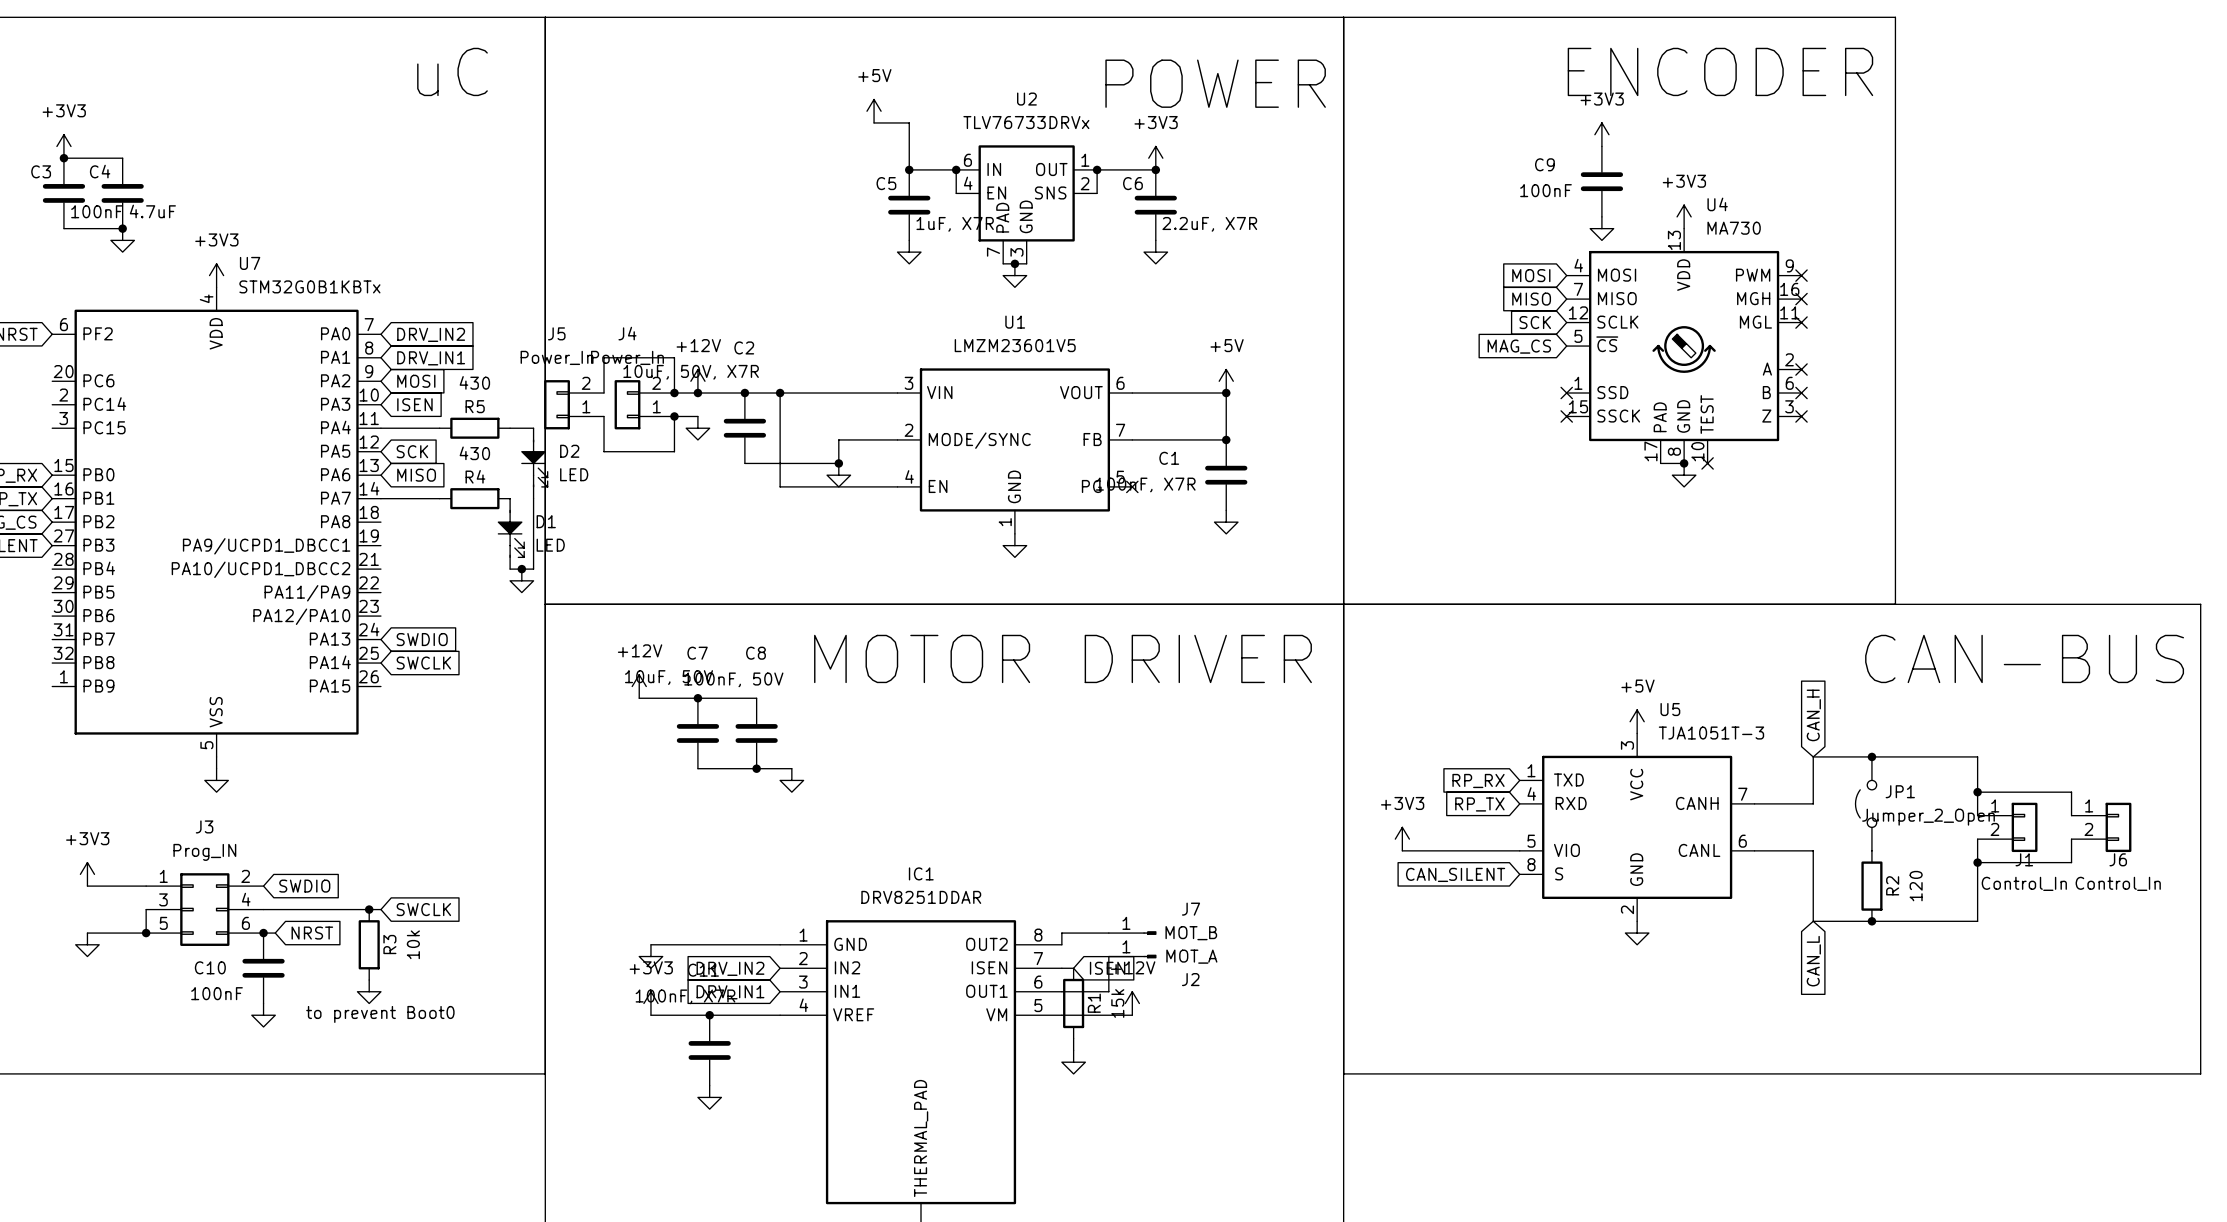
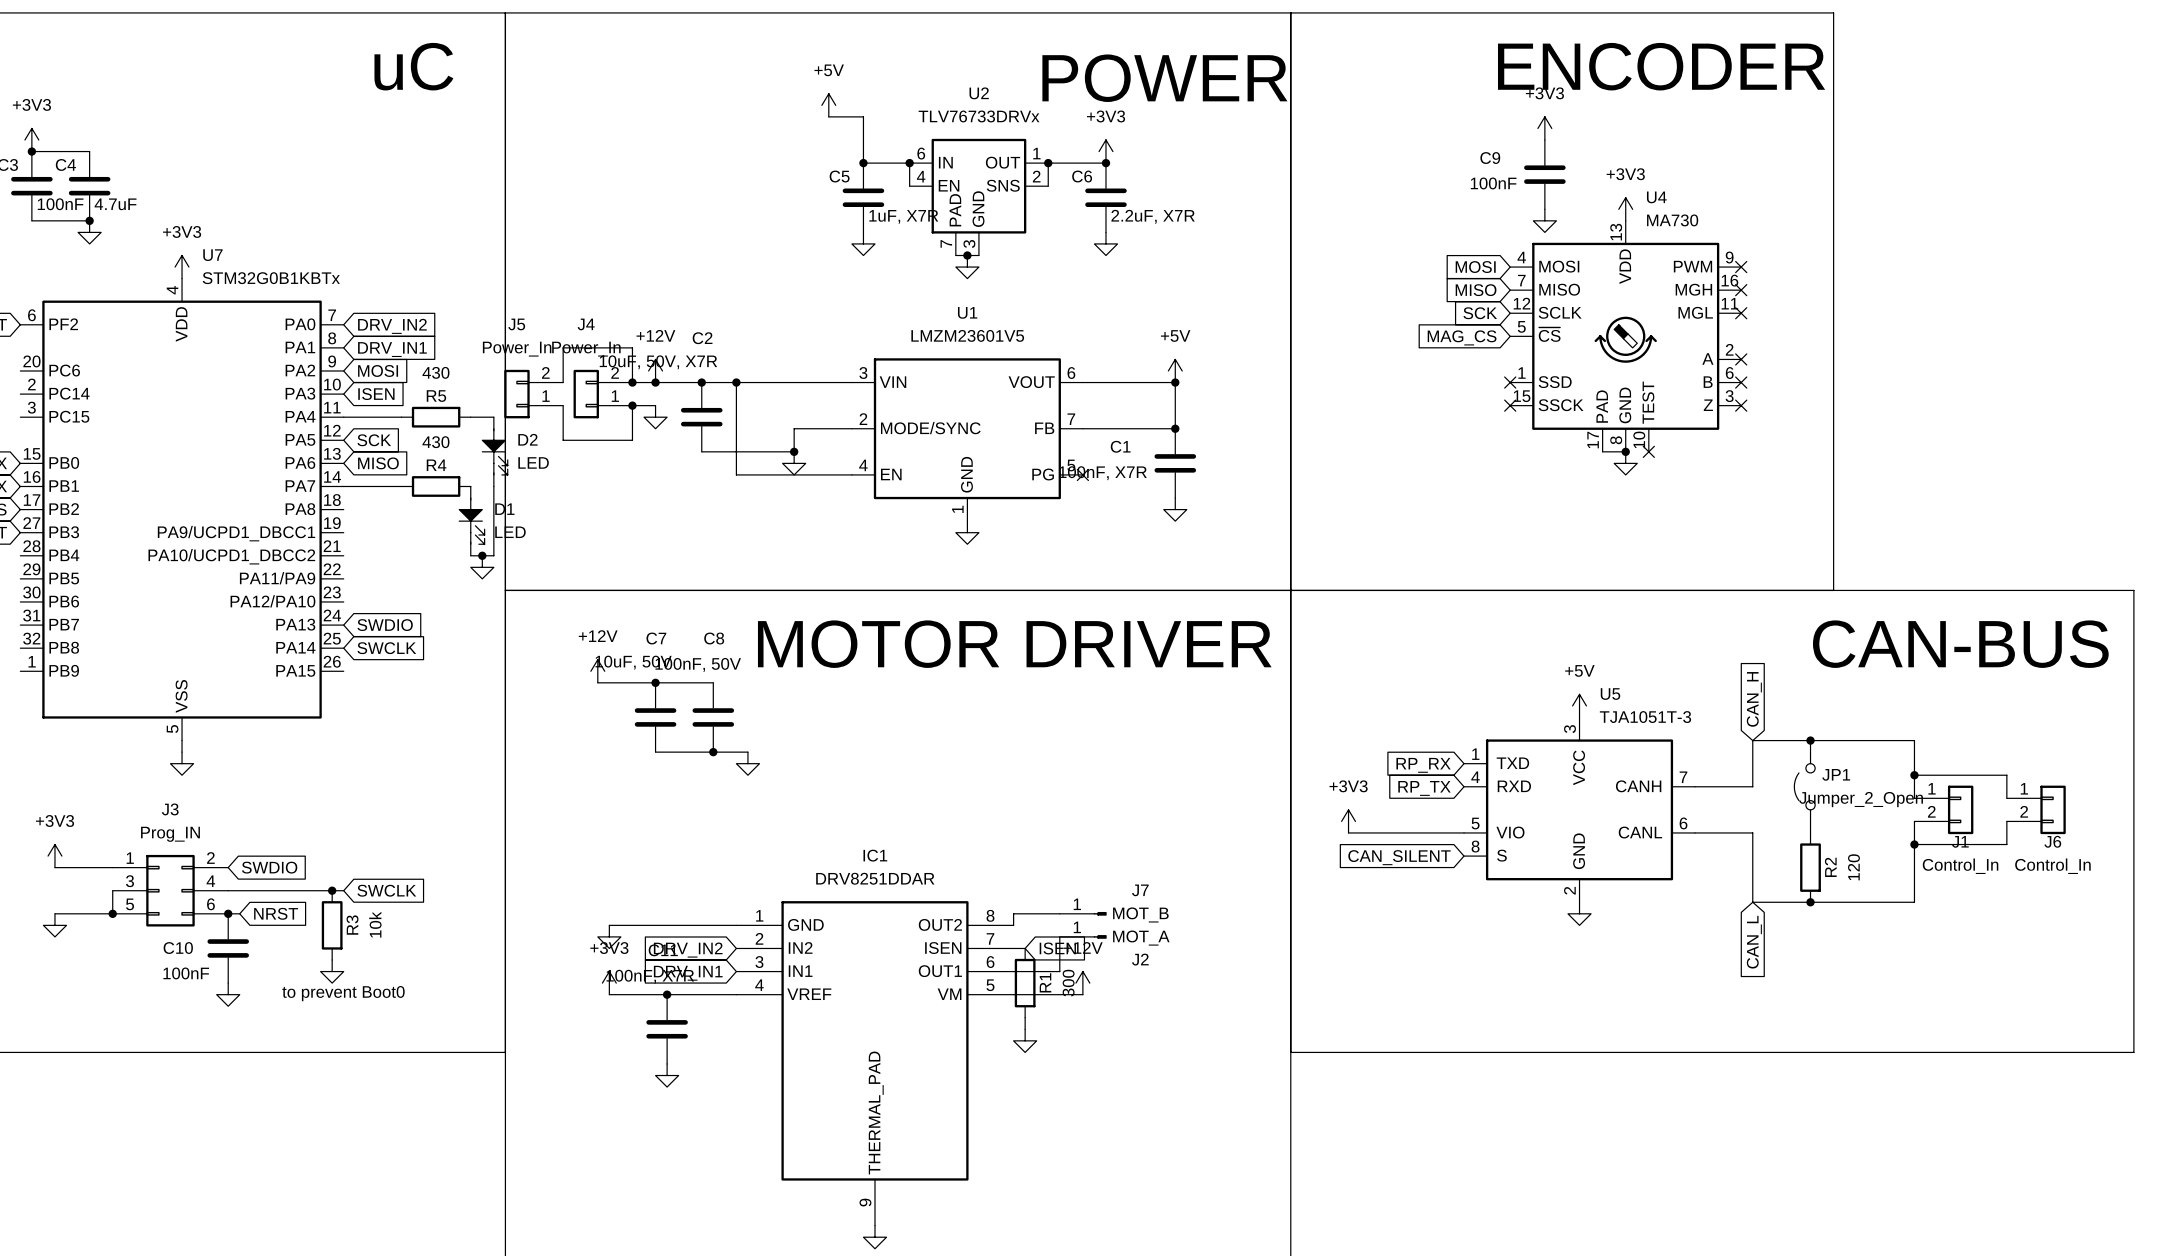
R1 value: 15k (1117, 1003) -> 300 (1068, 983)

